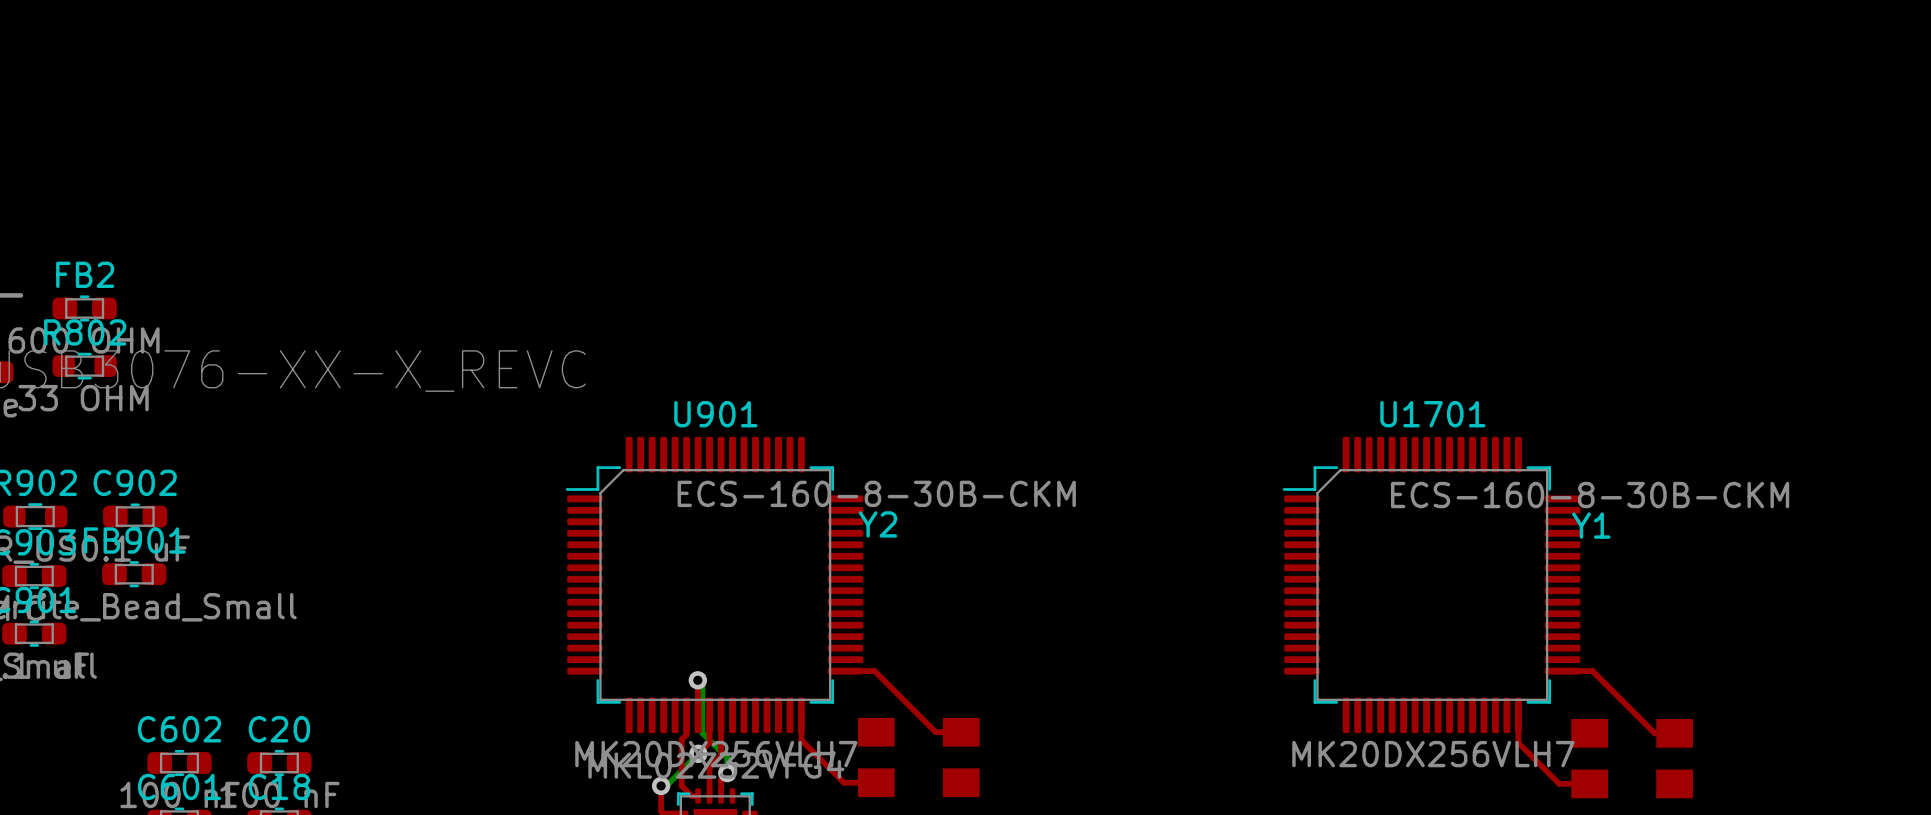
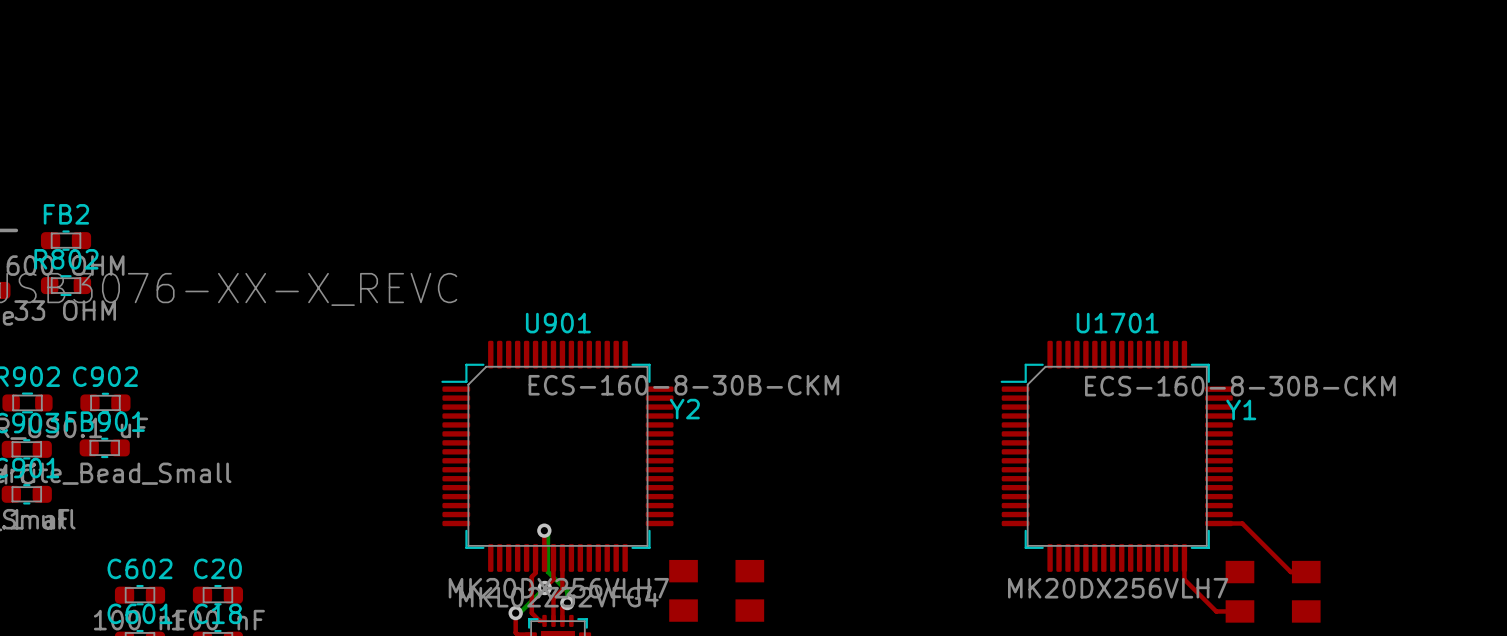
top track: (845, 671) (874, 671) (935, 732) (961, 732) -> none
top track: (801, 715) (801, 740) (843, 782) (876, 782) -> none

